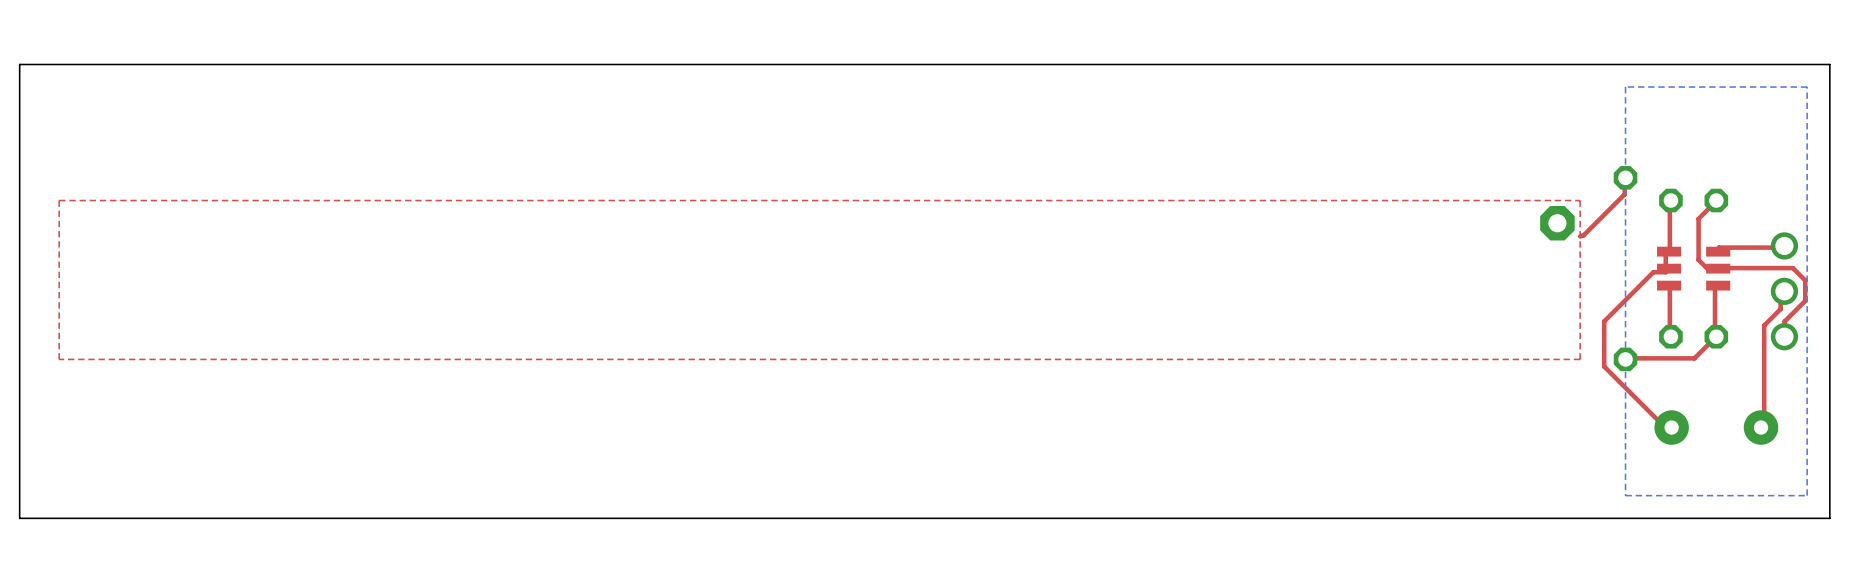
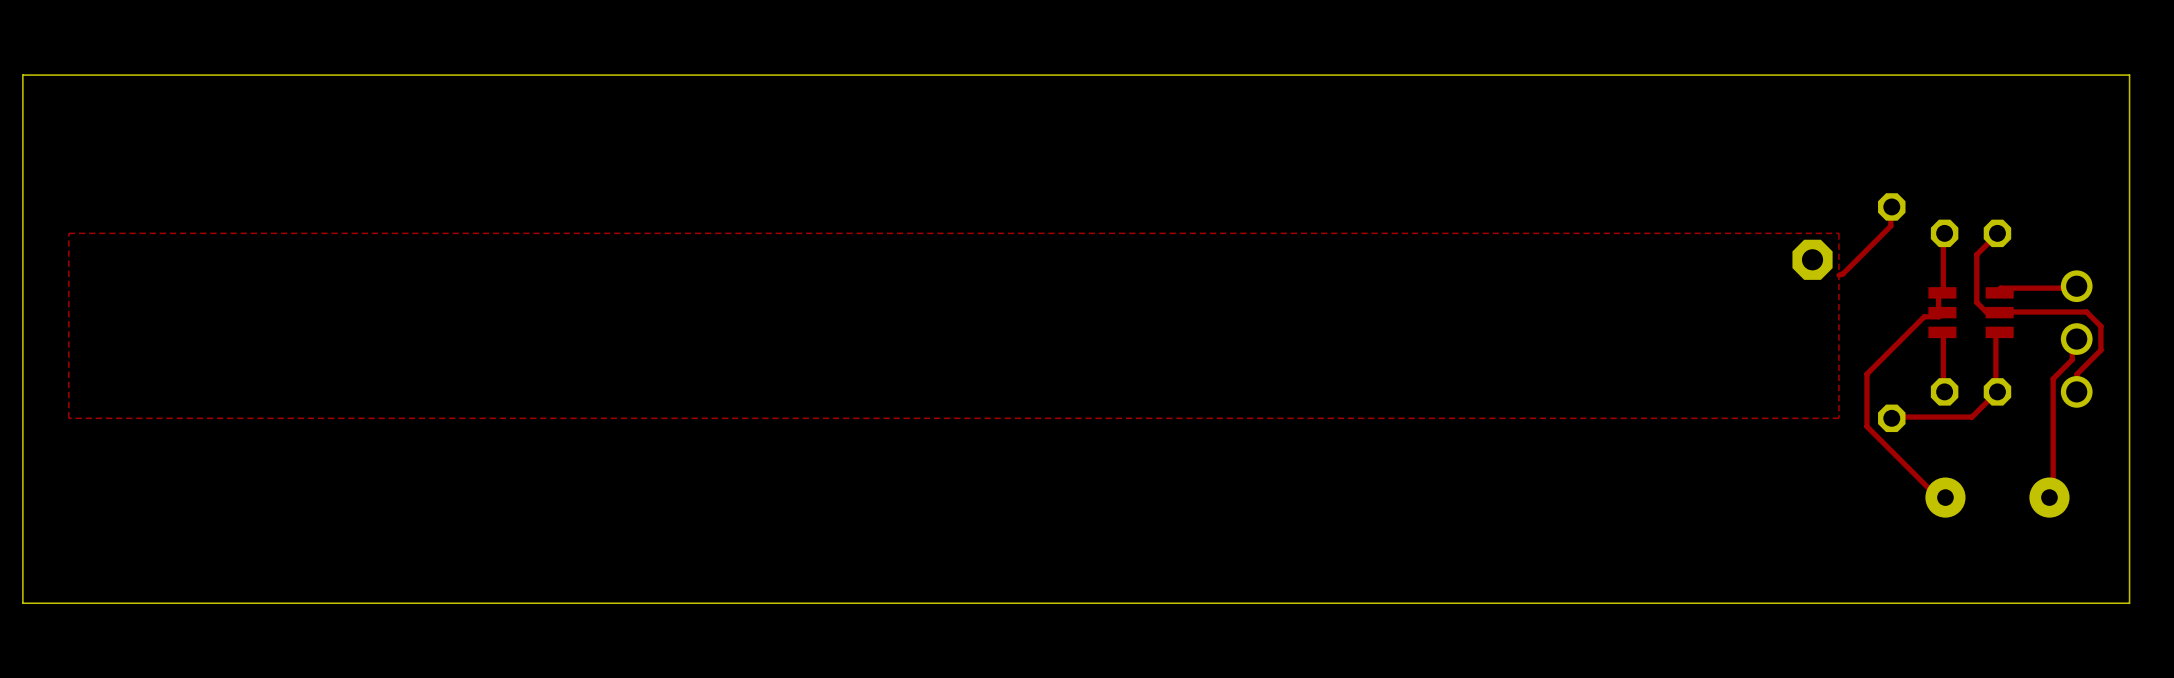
bottom zone outline: (1807, 87) (1625, 87) (1625, 495) (1807, 495) (1807, 87) -> none

